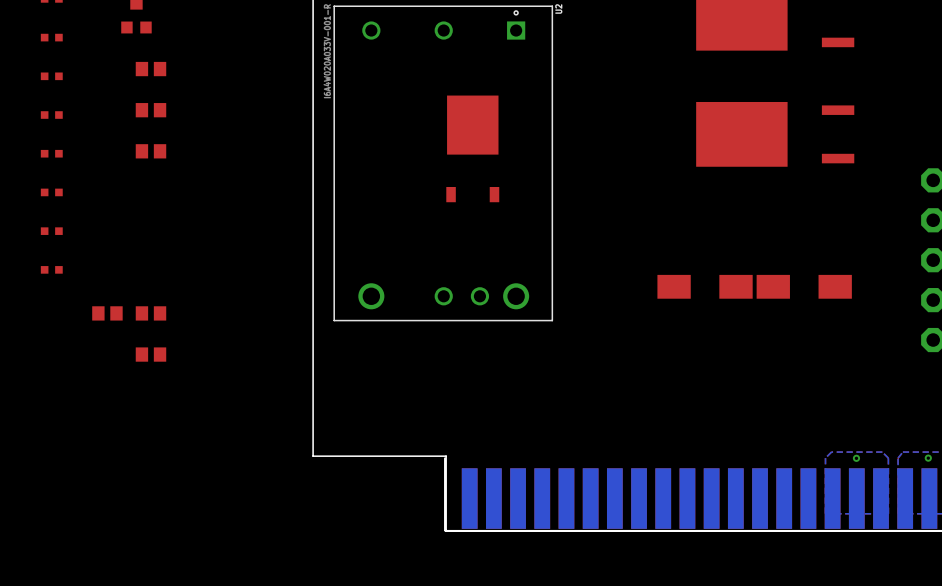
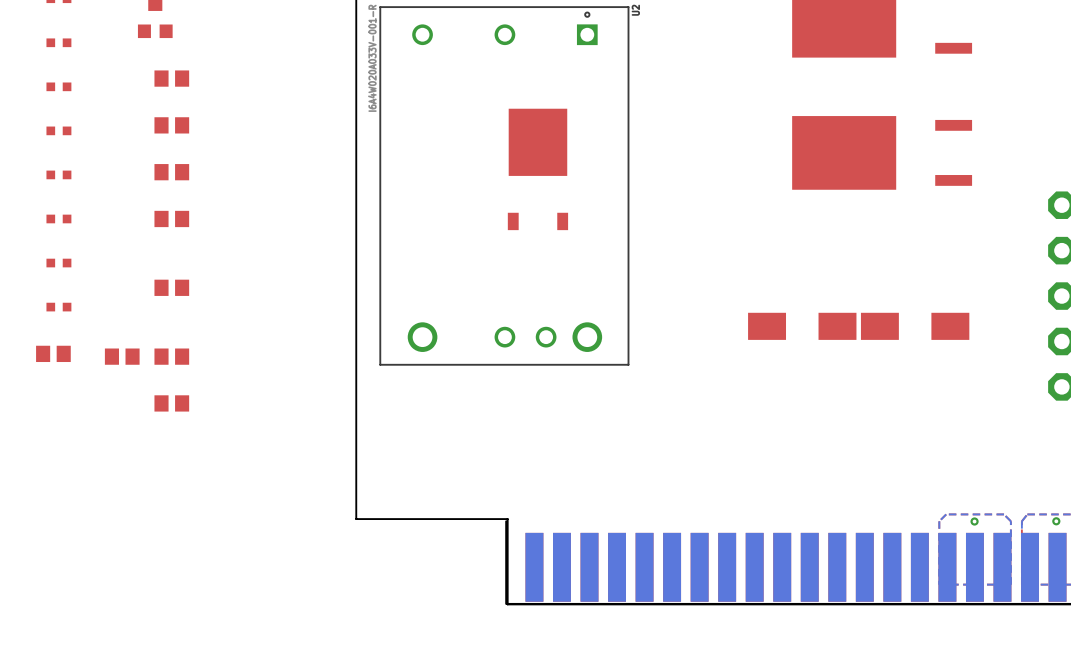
part: none -> (171, 218)
part: none -> (171, 287)
part: none -> (53, 353)

